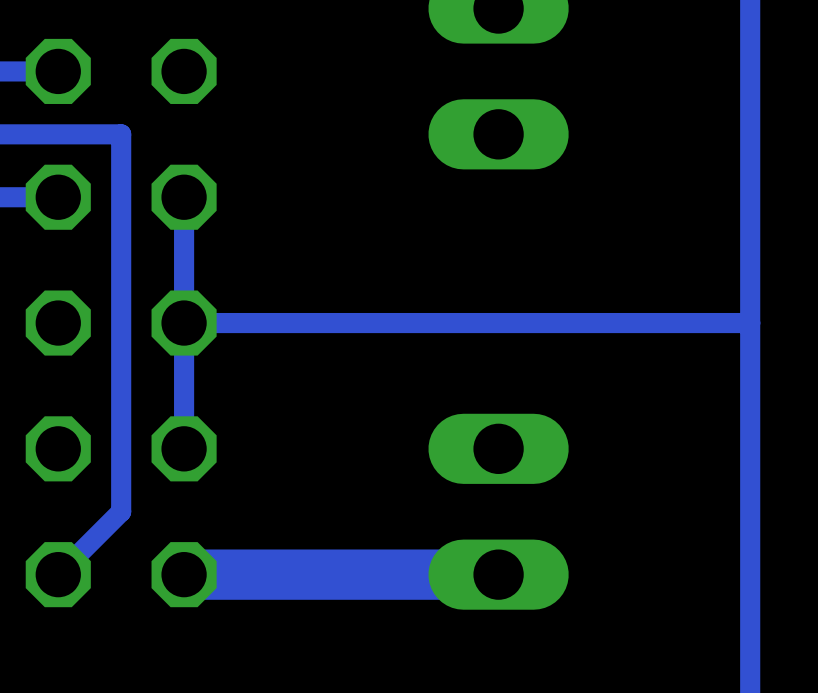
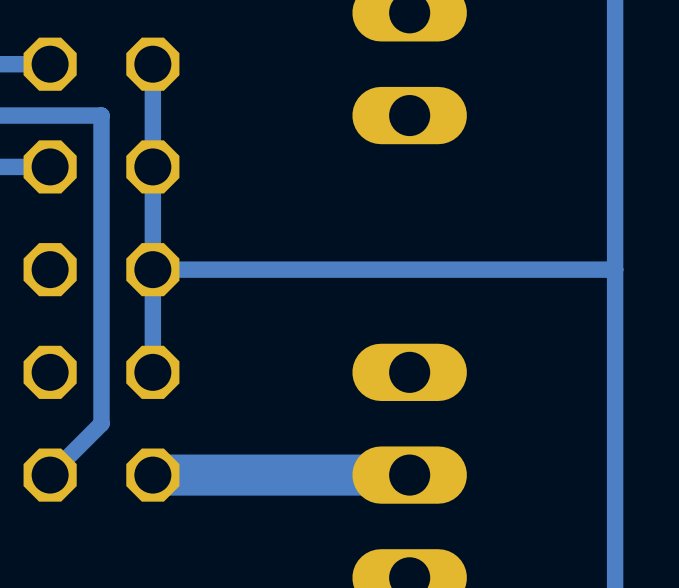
track: none -> (152, 64) (152, 166)

